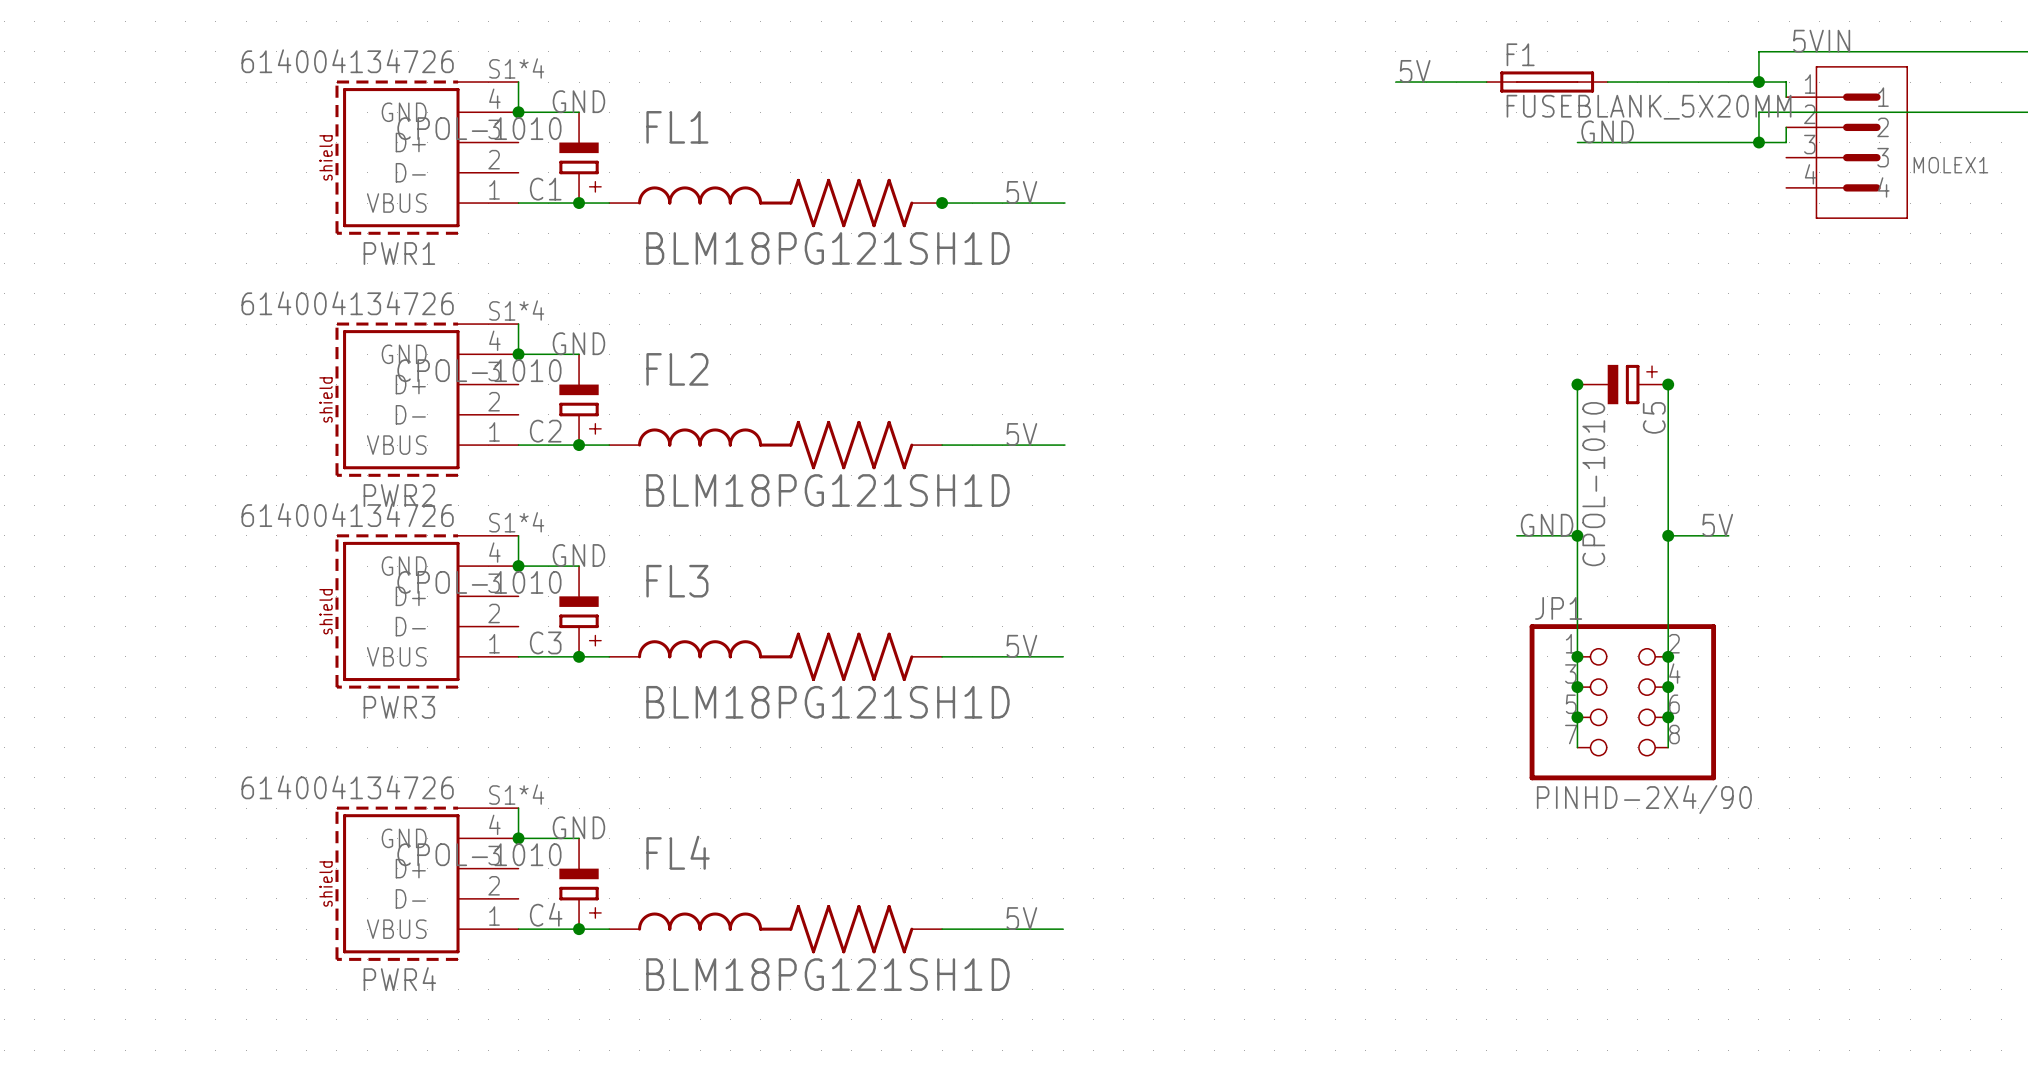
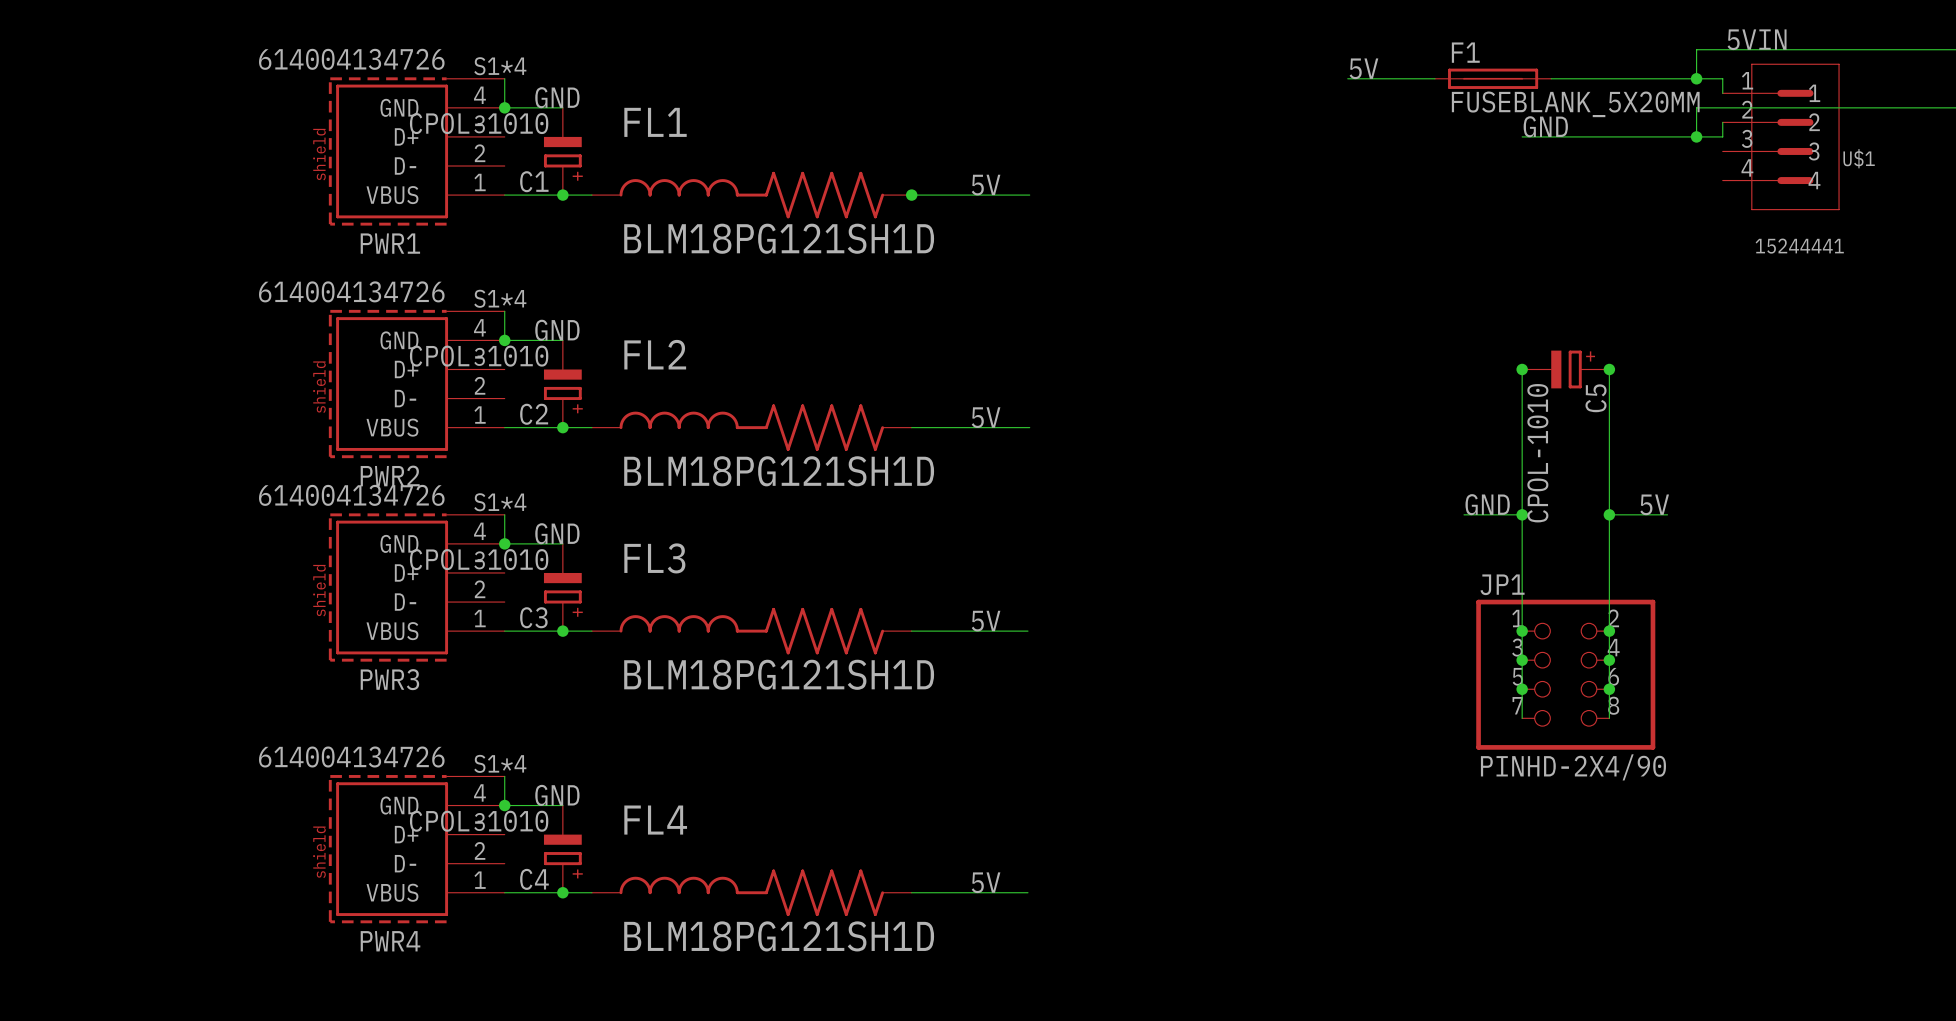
MOLEX1 name: MOLEX1 (1950, 165) -> U$1 (1859, 158)
MOLEX1 value: none -> 15244441 (1799, 246)

